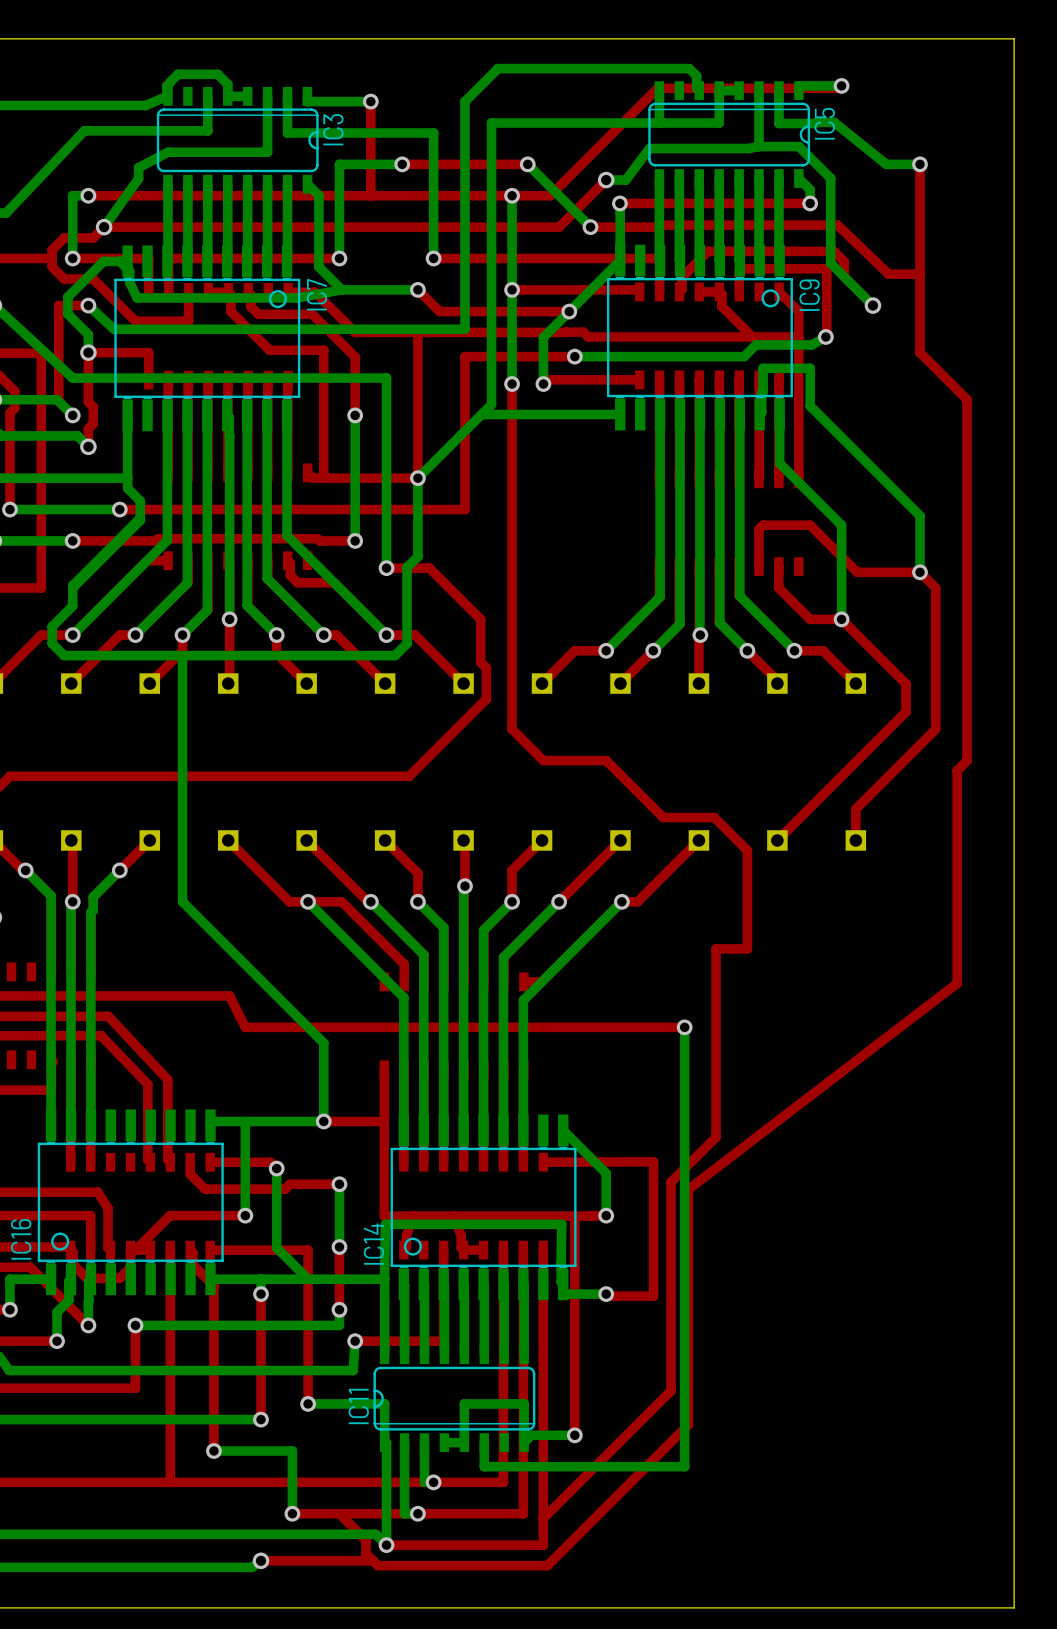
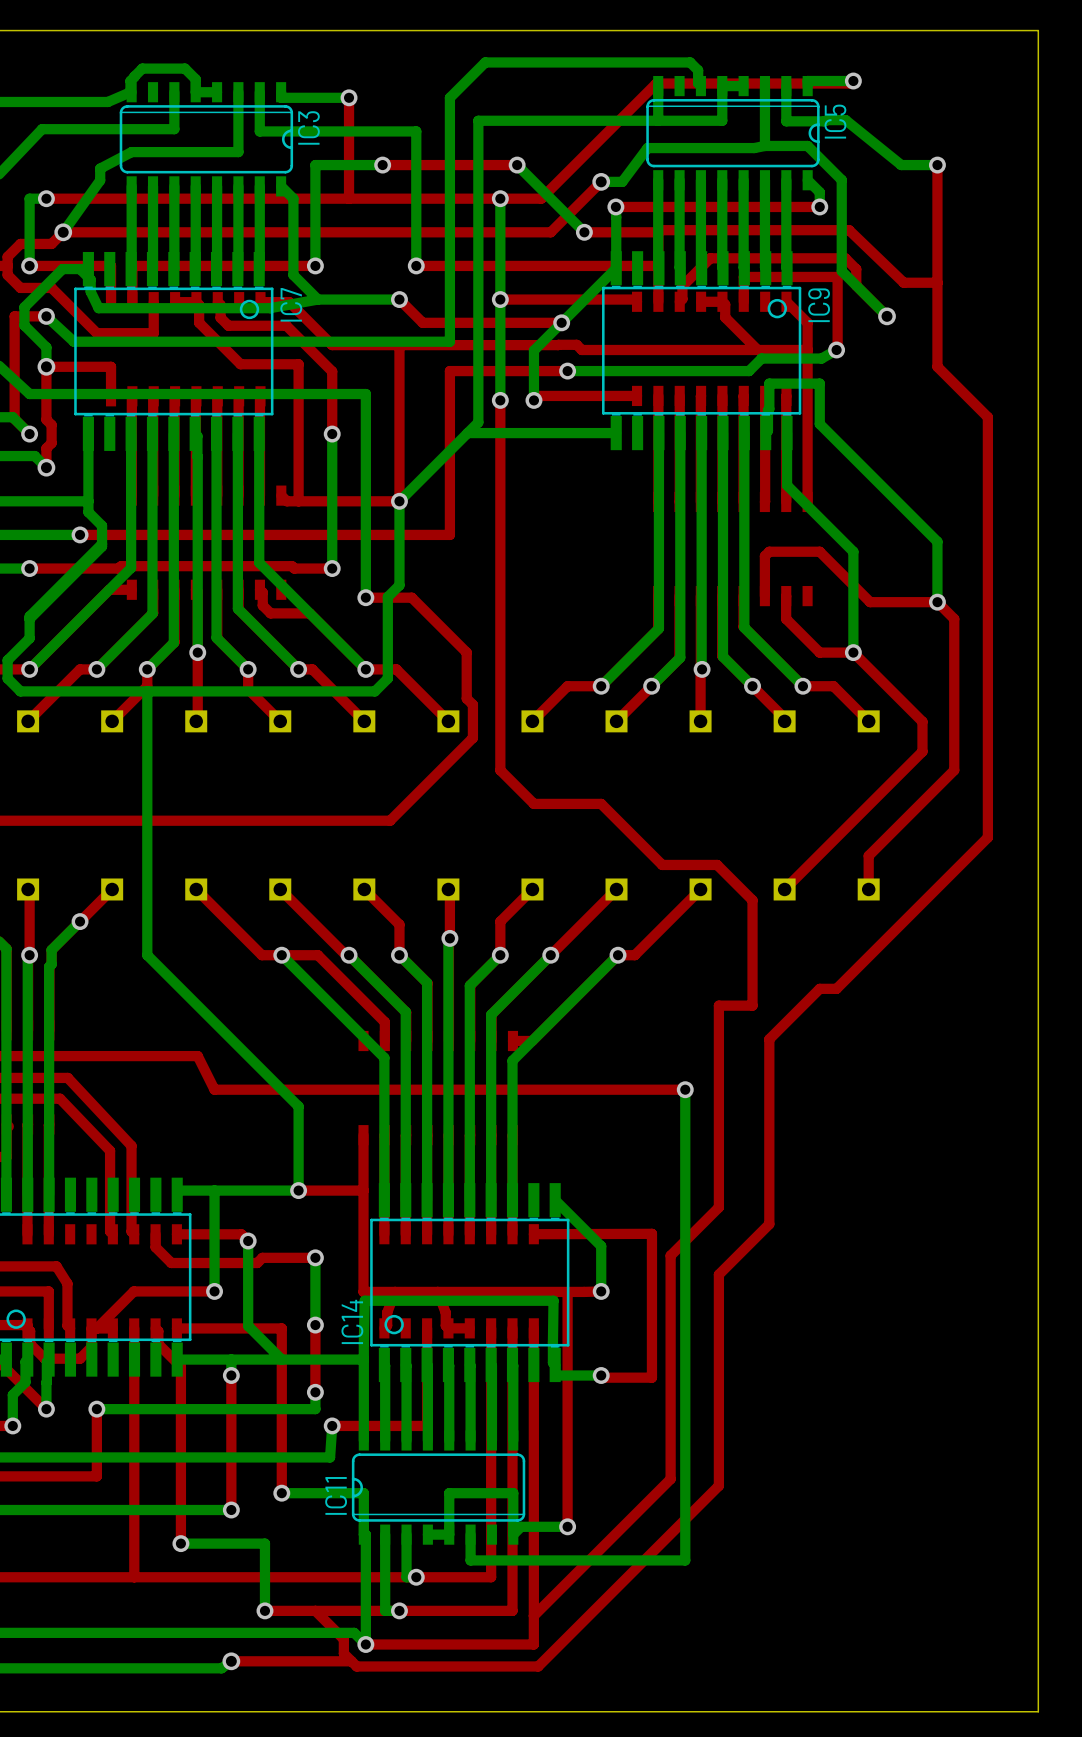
top track: (967, 760) (957, 770) (957, 983) (688, 1189) (688, 1424) -> (987, 803) (987, 837) (836, 988) (819, 988) (769, 1039) (769, 1224) (718, 1274) (718, 1485) (689, 1515)

